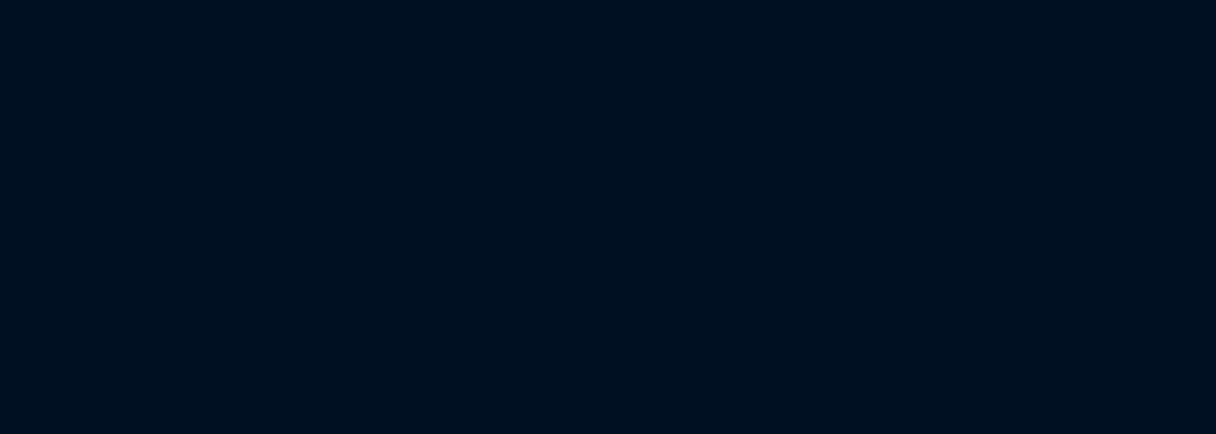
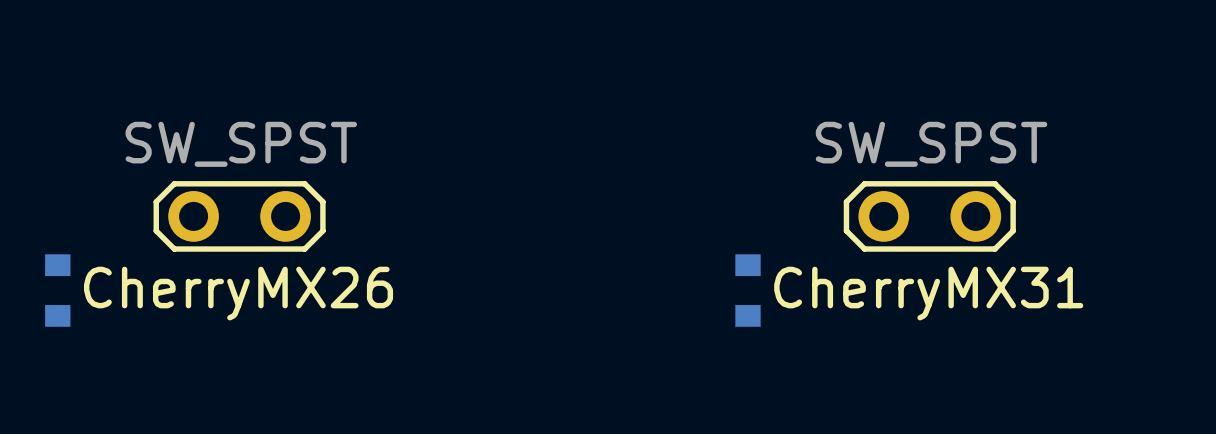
CherryMX26: none -> SW_SPST (239, 216)
CherryMX31: none -> SW_SPST (929, 216)
part: none -> (57, 290)
part: none -> (748, 290)

